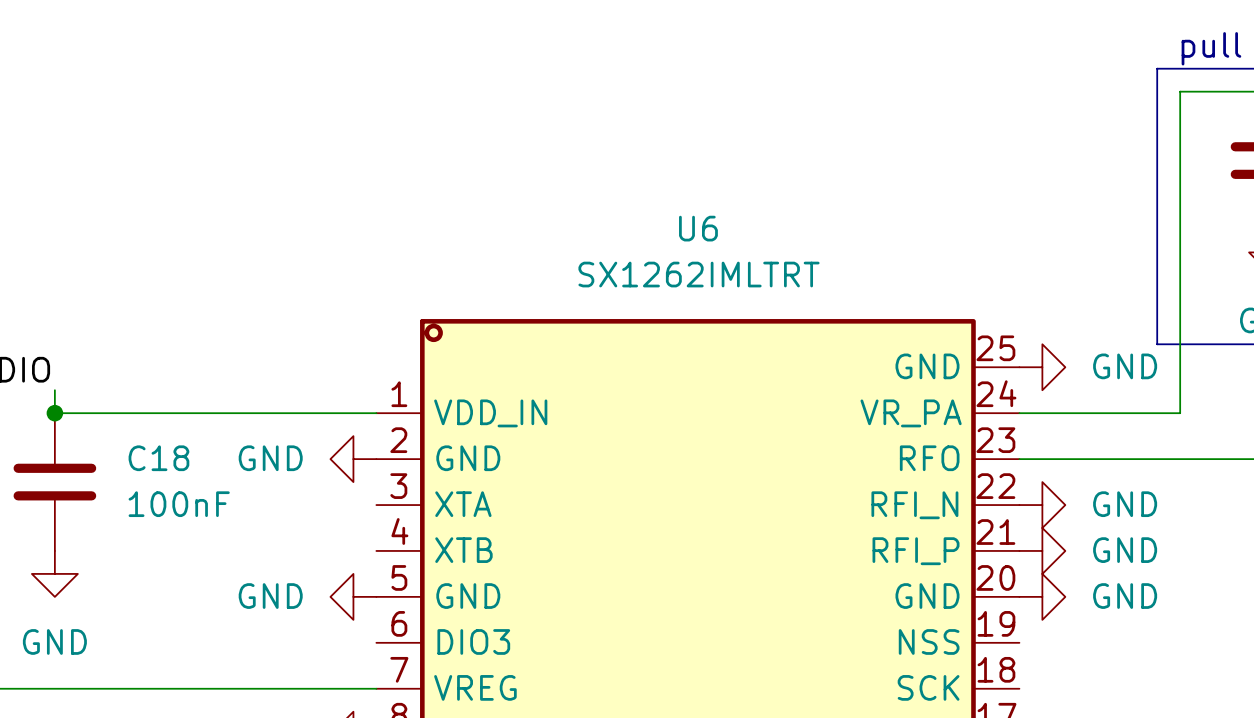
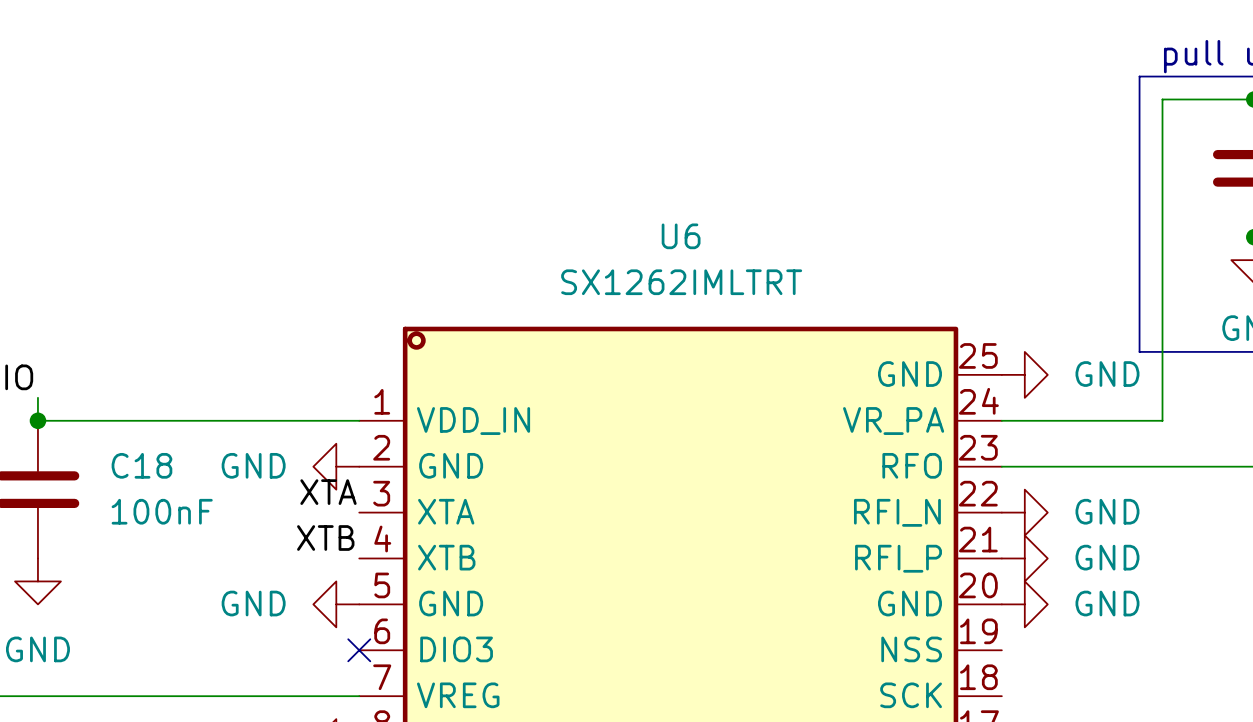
label: none -> XTA (328, 492)
label: none -> XTB (325, 538)
no-connect mark: none -> (359, 650)

